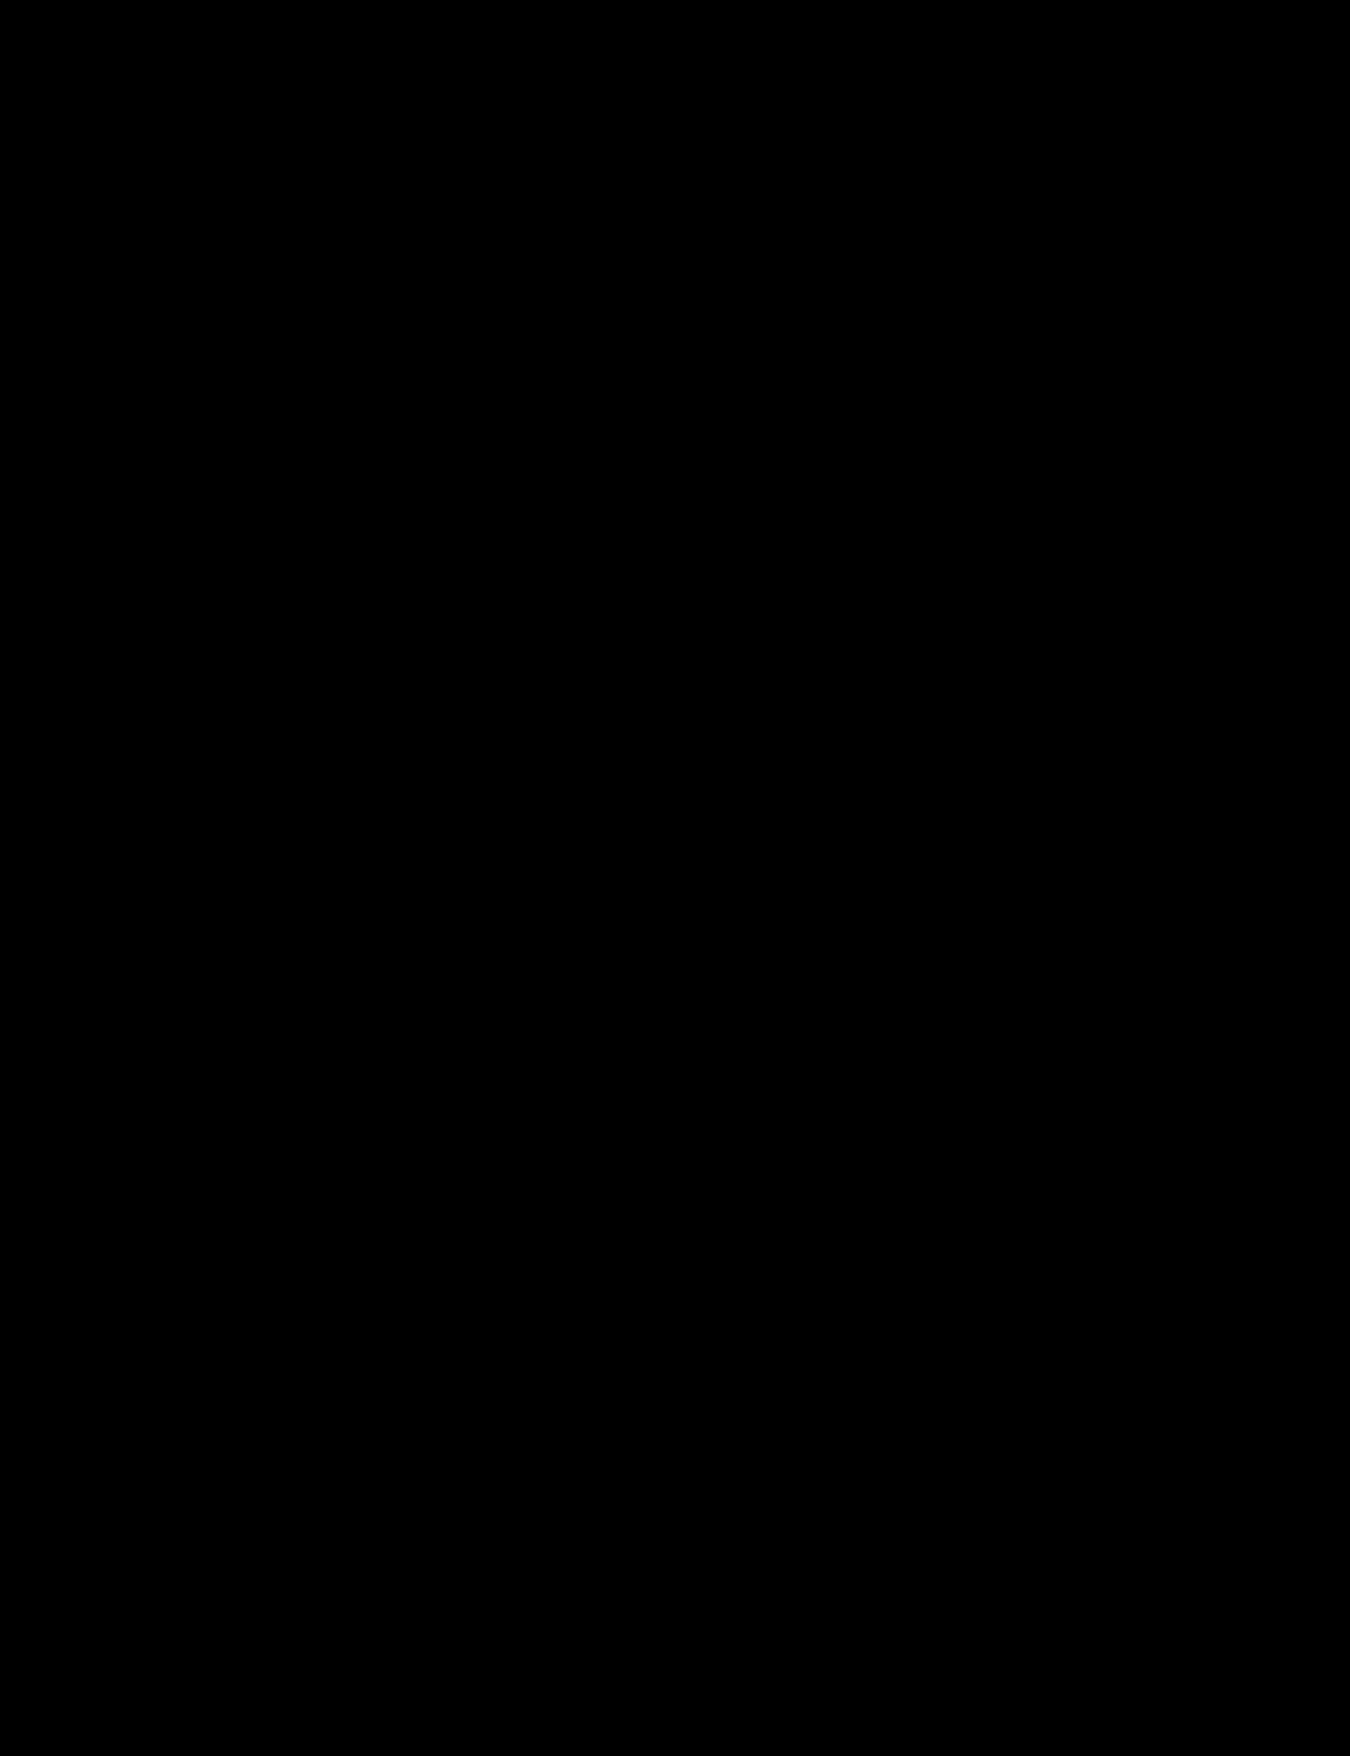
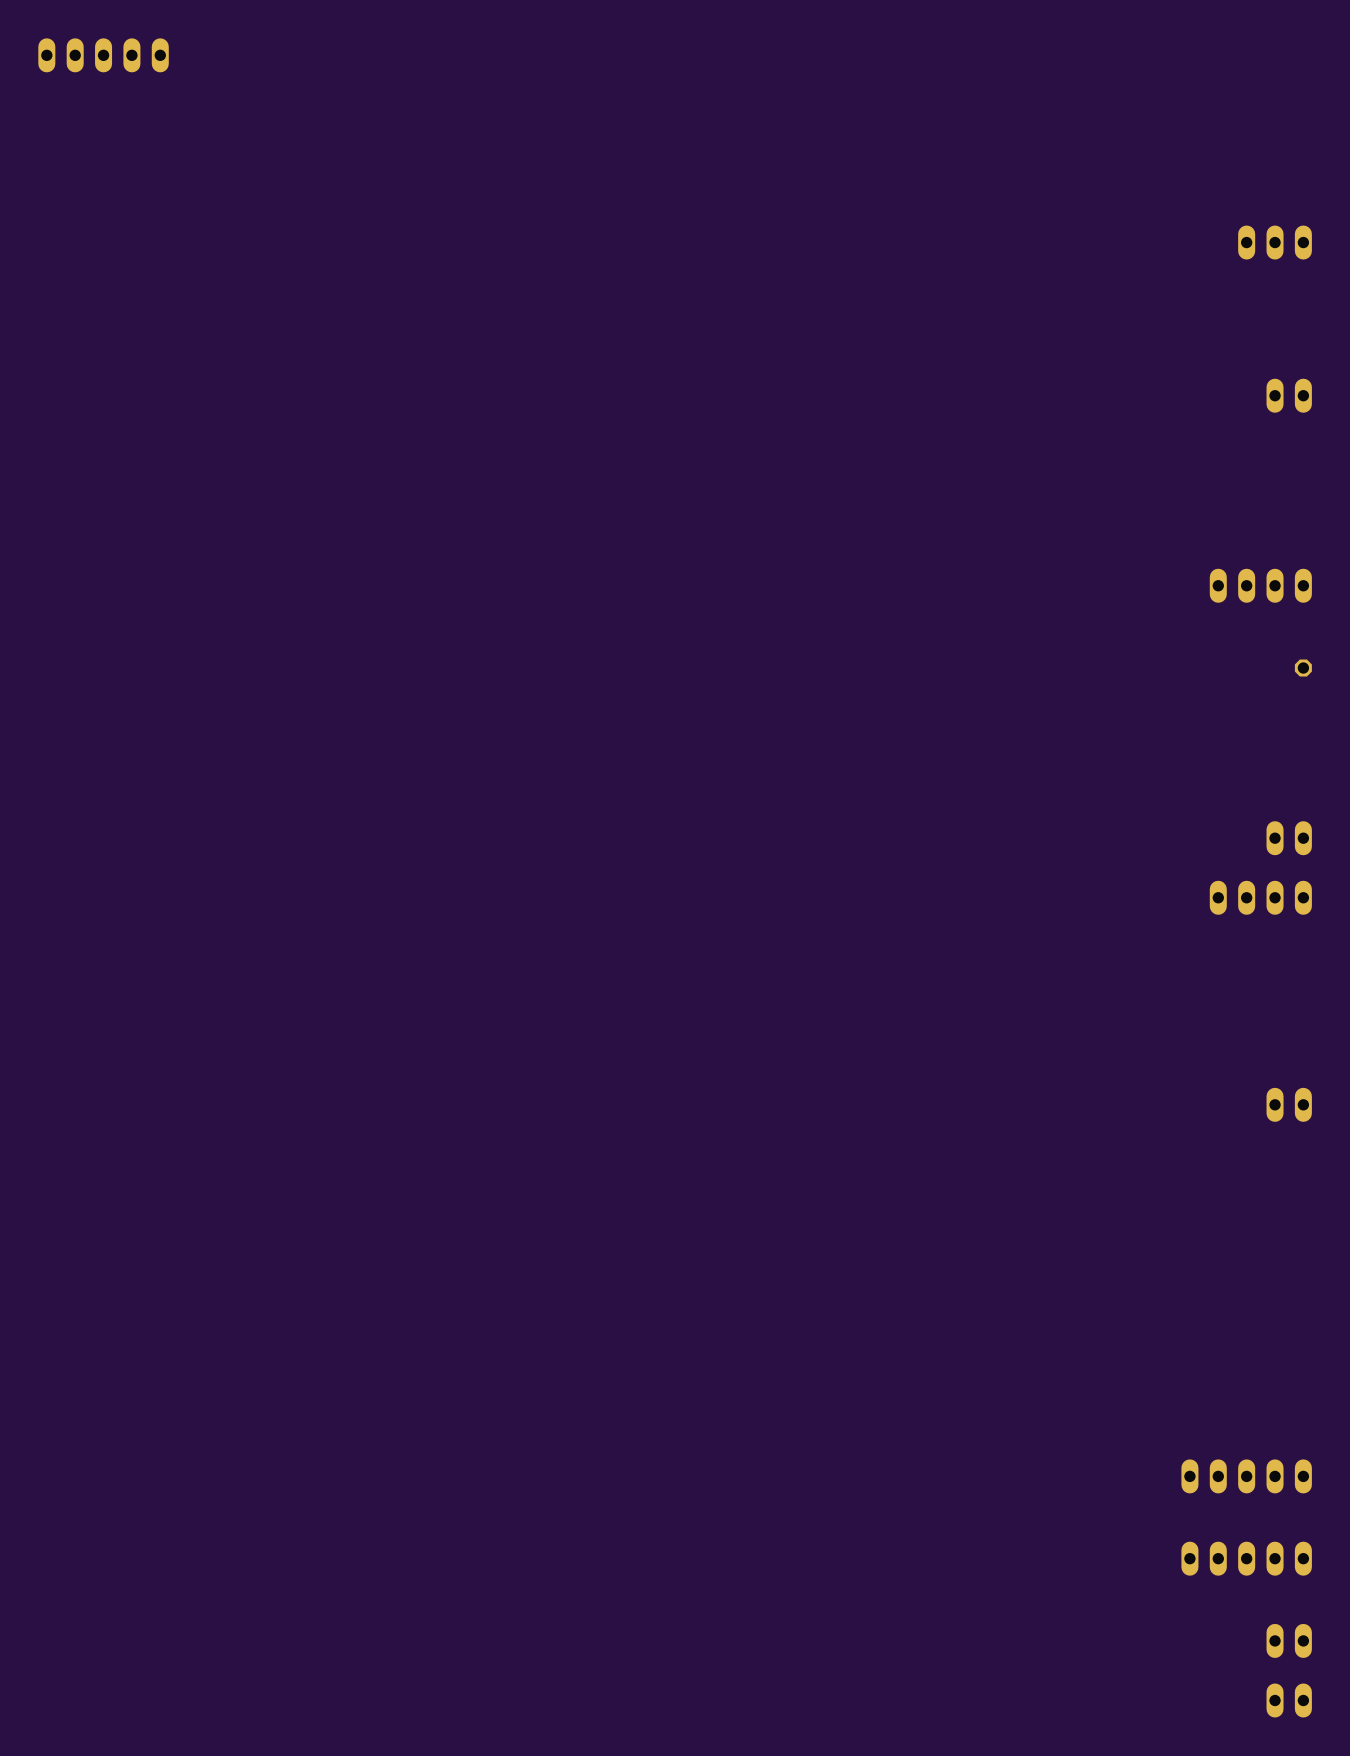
part: none -> (103, 55)
part: none -> (1275, 242)
part: none -> (1289, 395)
part: none -> (1260, 585)
part: none -> (1303, 668)
part: none -> (1289, 838)
part: none -> (1260, 897)
part: none -> (1289, 1104)
part: none -> (1246, 1476)
part: none -> (1246, 1558)
part: none -> (1289, 1640)
part: none -> (1289, 1700)

